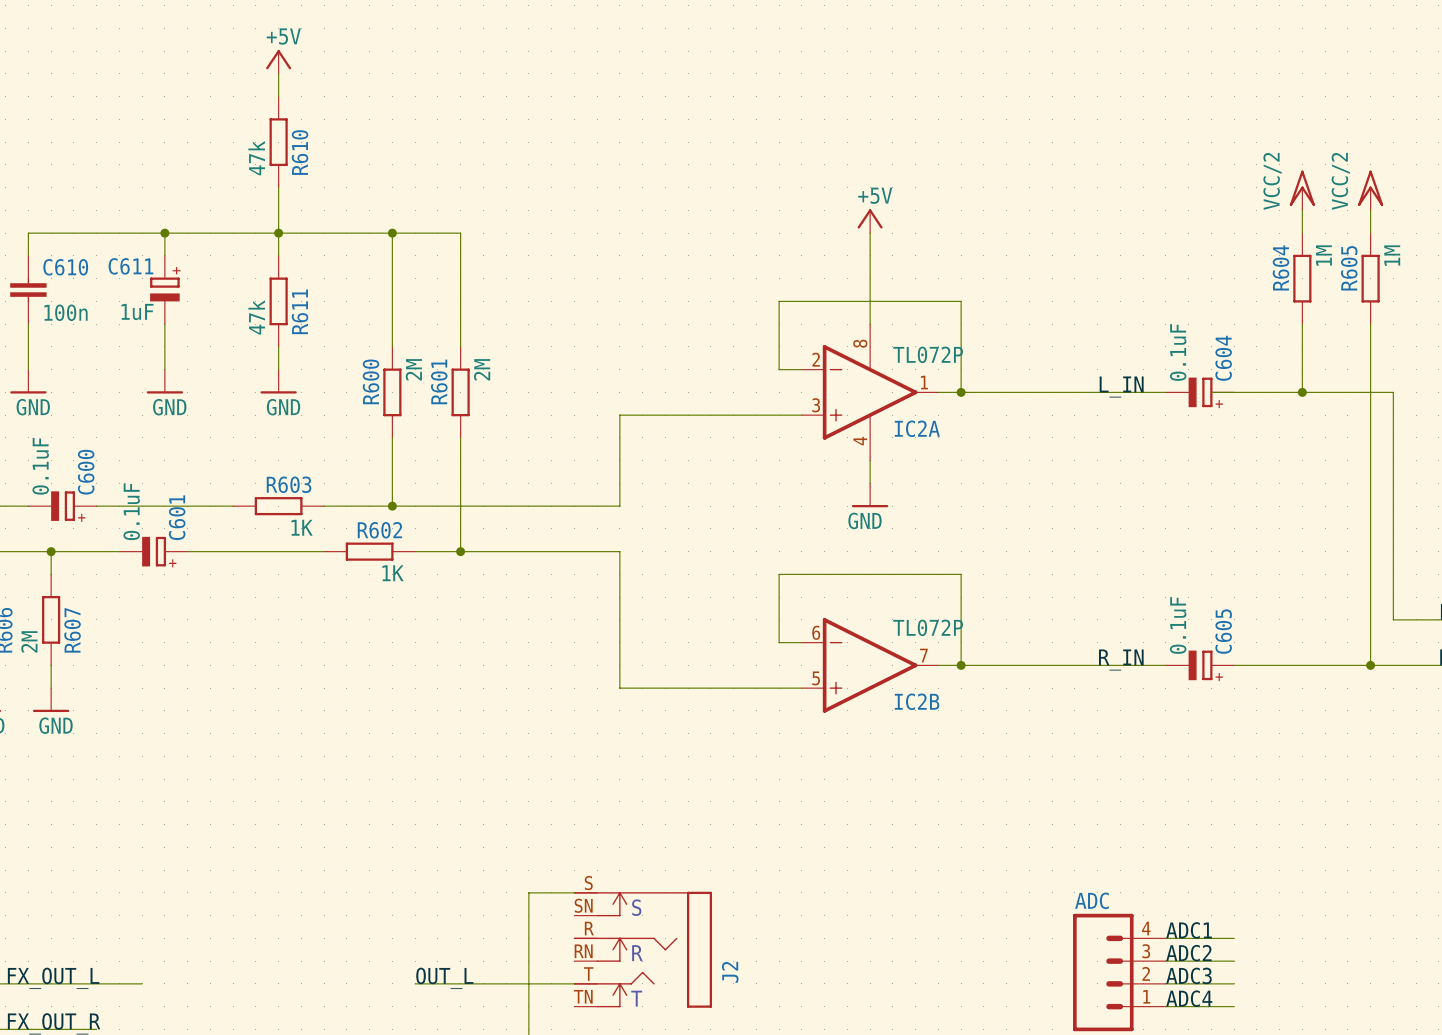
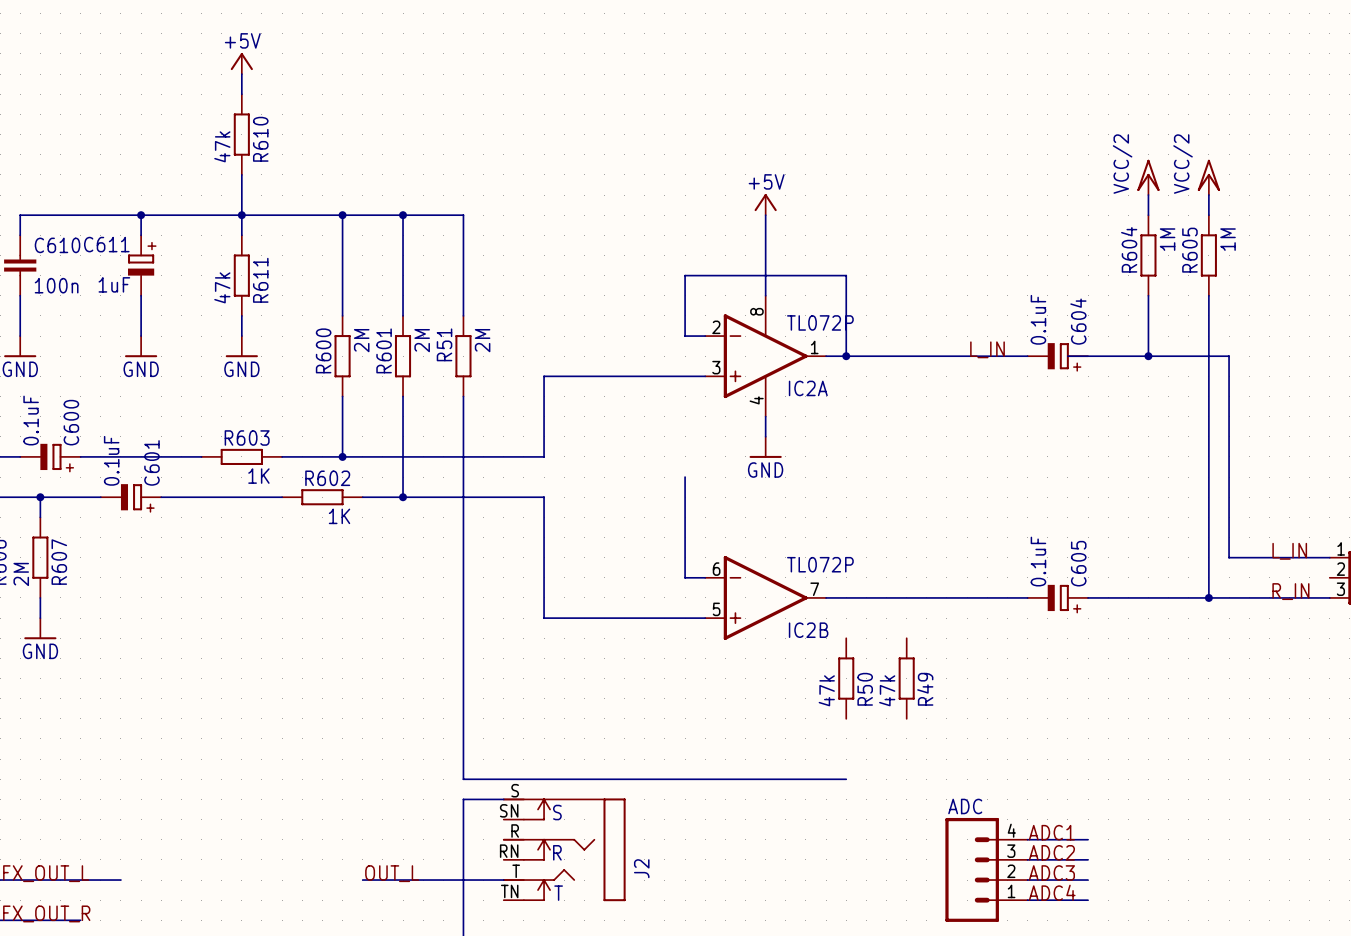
wire: none -> (403, 215) (463, 215) (463, 315)
junction: none -> (403, 215)
R51: none -> 2M (463, 356)
wire: none -> (463, 396) (463, 779) (846, 779)
wire: (779, 574) (961, 574) (961, 665) -> (685, 517) (685, 477)
label: R_IN (1121, 660) -> none
junction: (961, 665) -> none
R50: none -> 47k (846, 678)
R49: none -> 47k (906, 678)

